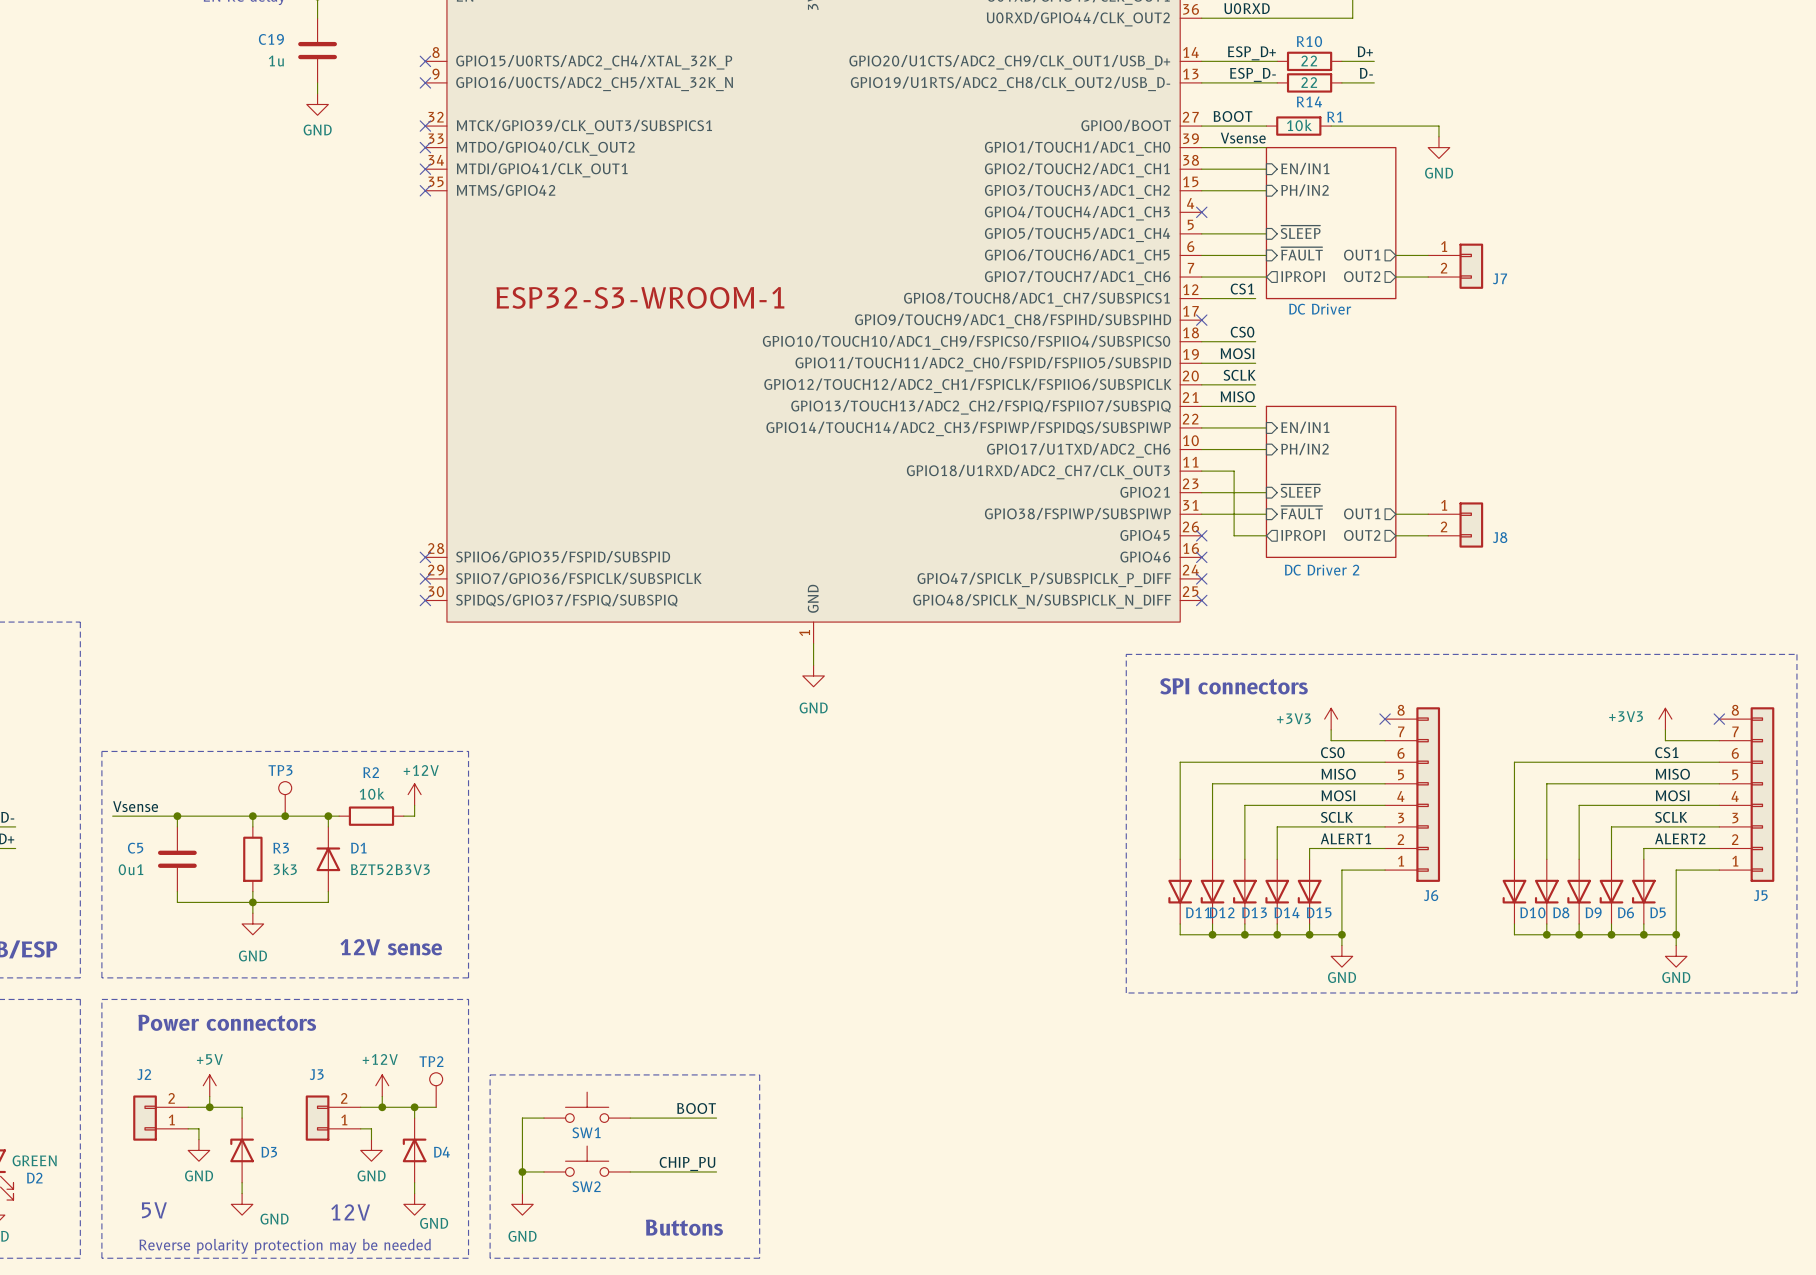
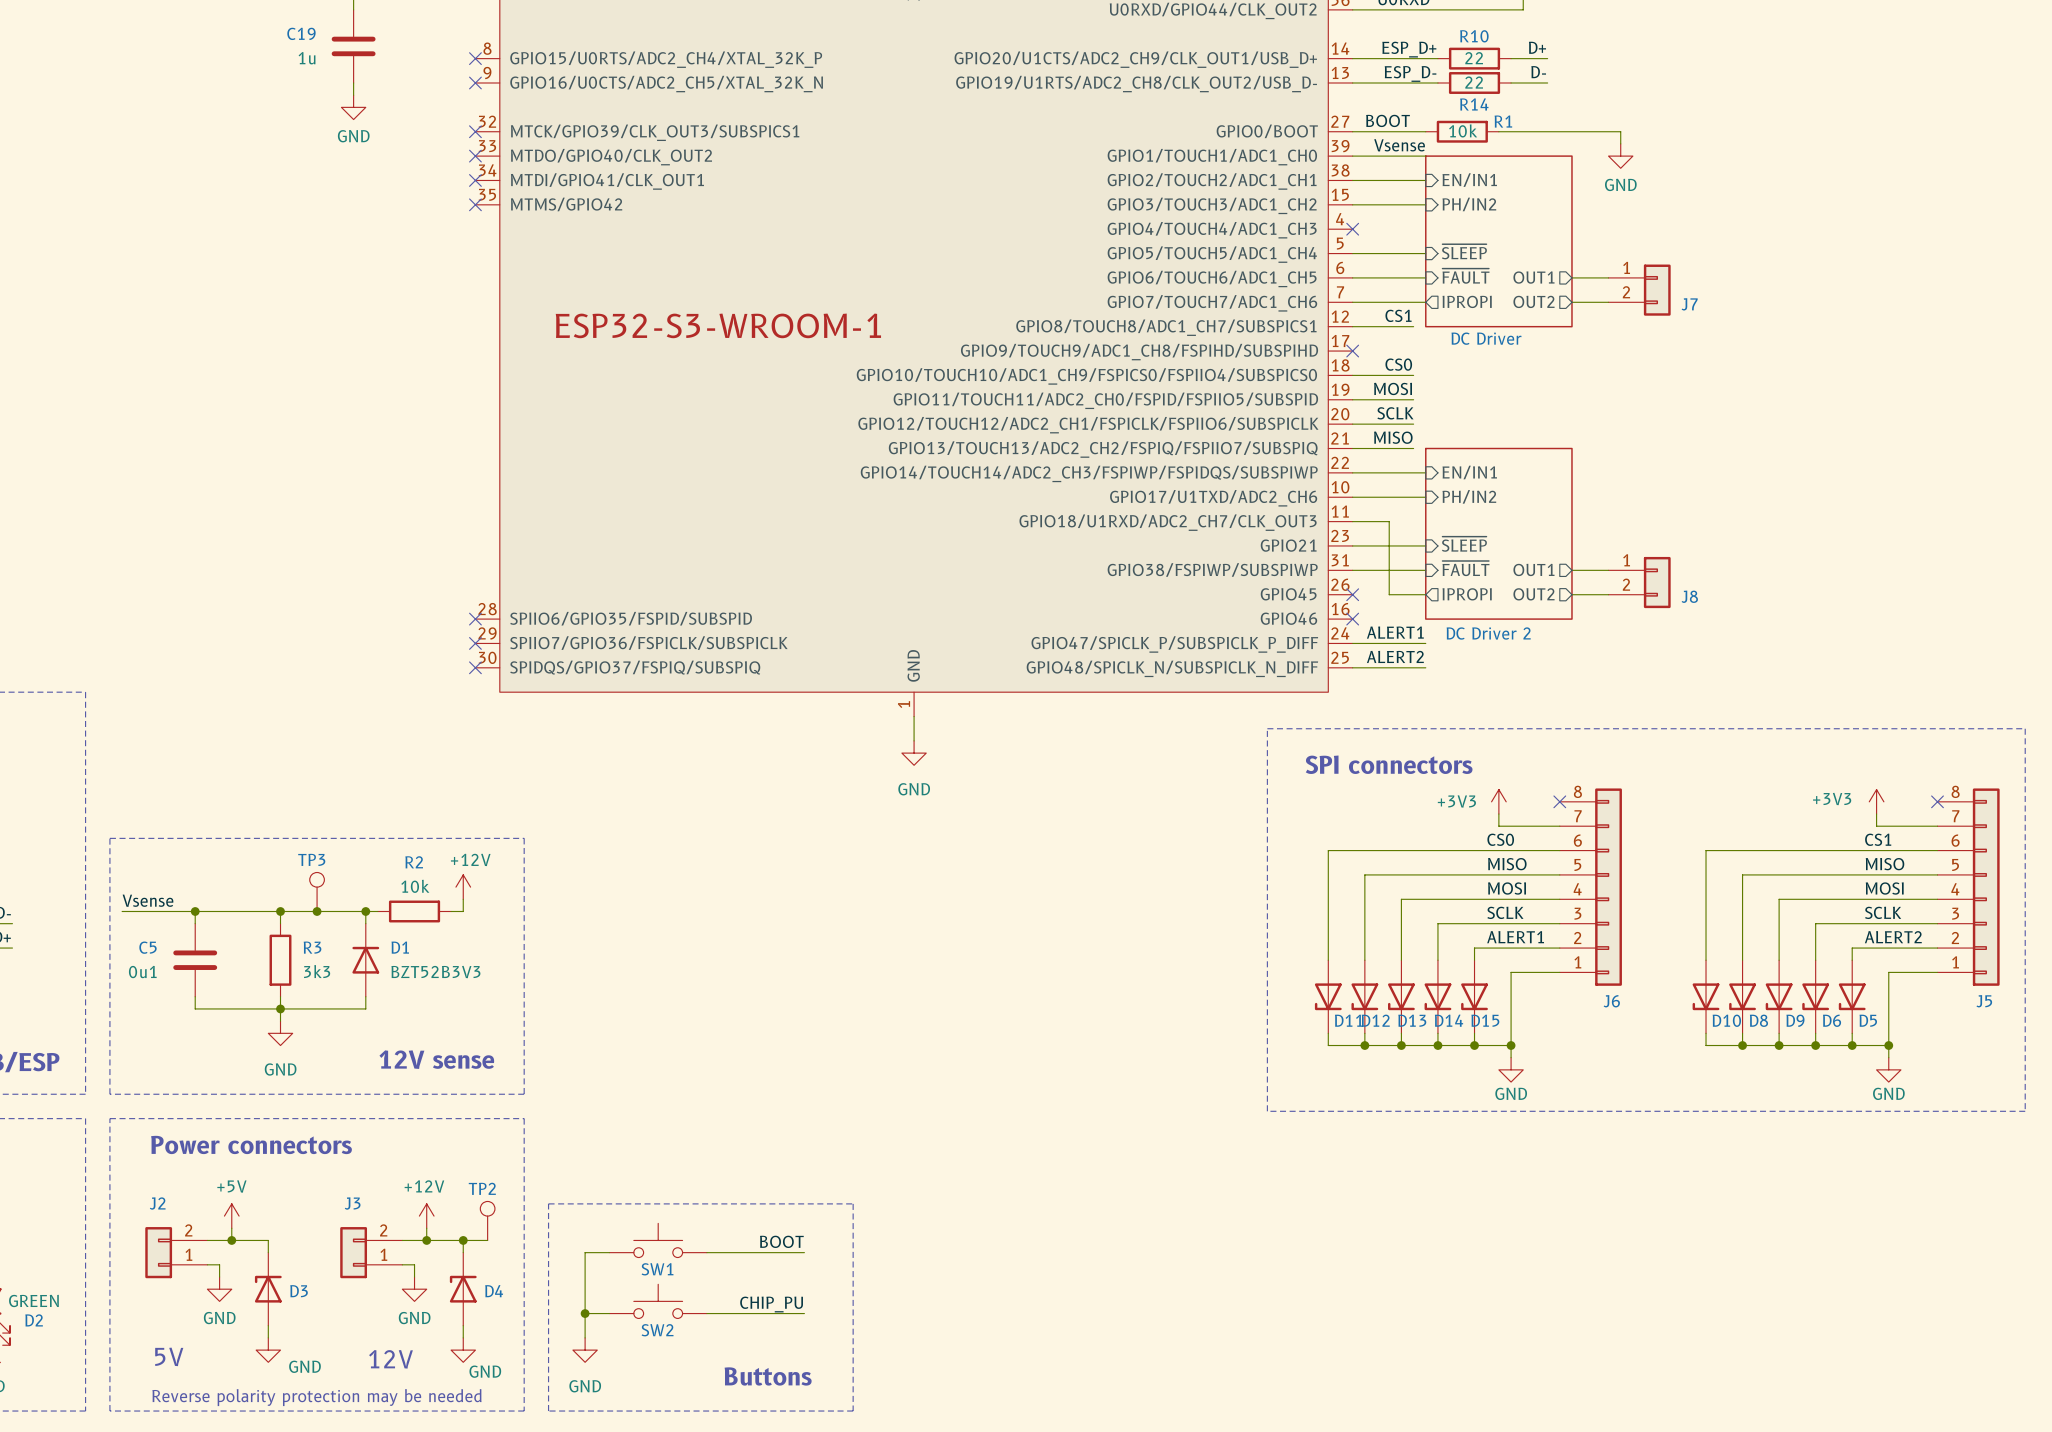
label: none -> ALERT1 (1395, 632)
wire: none -> (1352, 643) (1425, 643)
no-connect mark: (1201, 578) -> none
label: none -> ALERT2 (1395, 656)
wire: none -> (1352, 667) (1425, 667)
no-connect mark: (1201, 600) -> none

